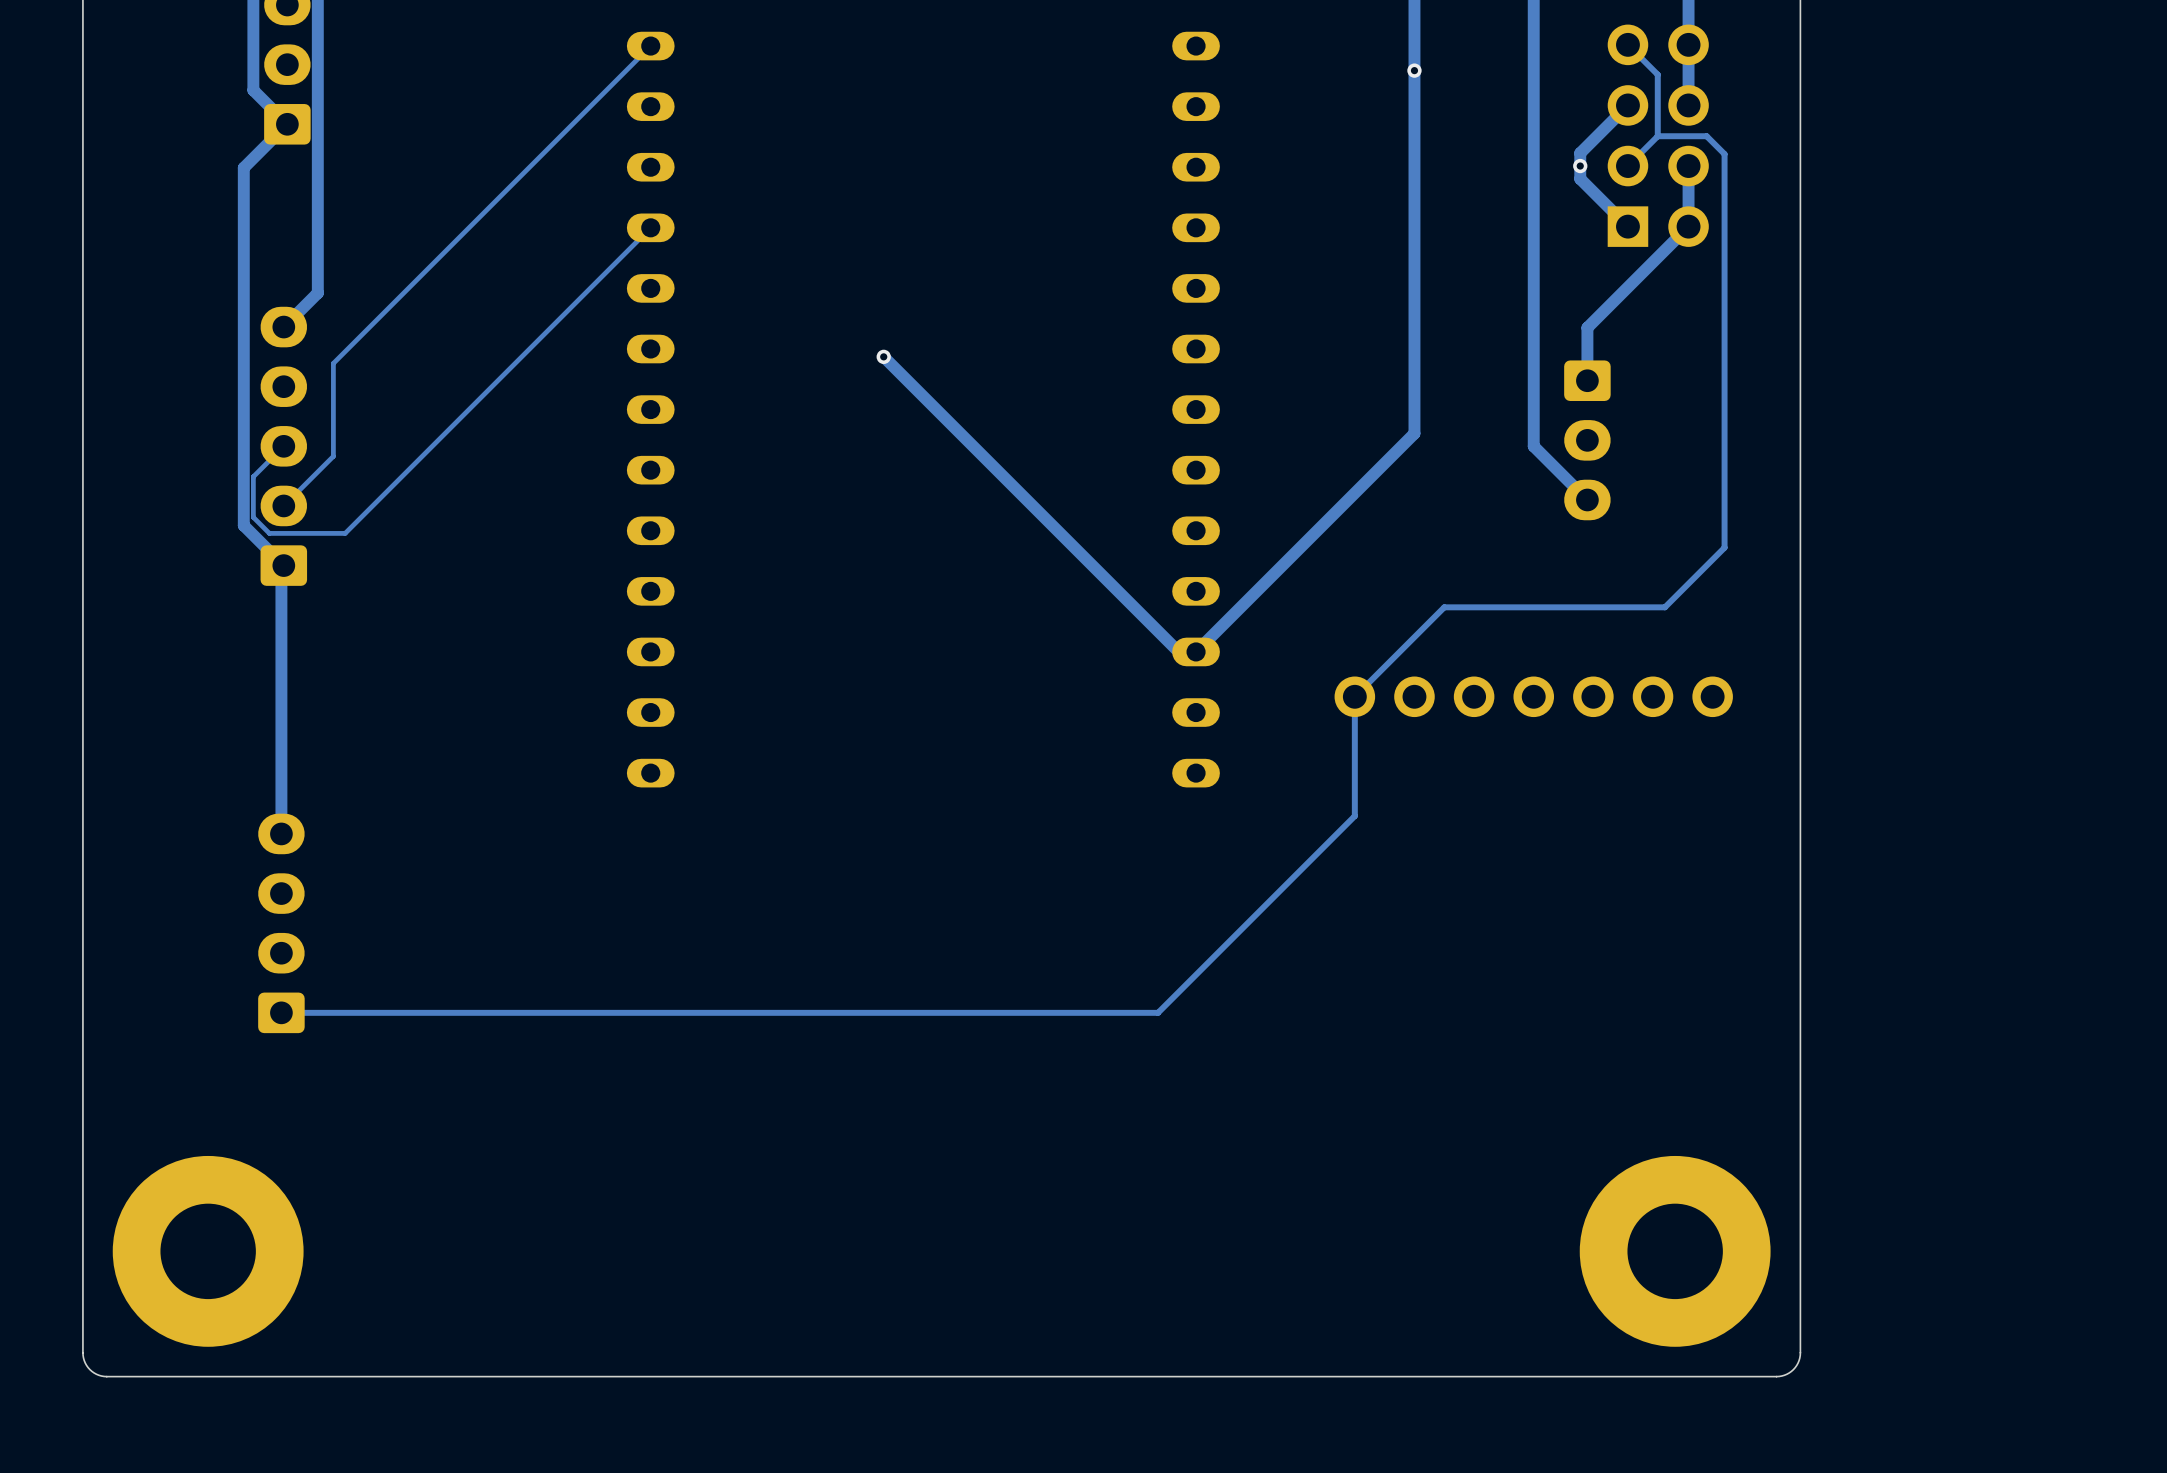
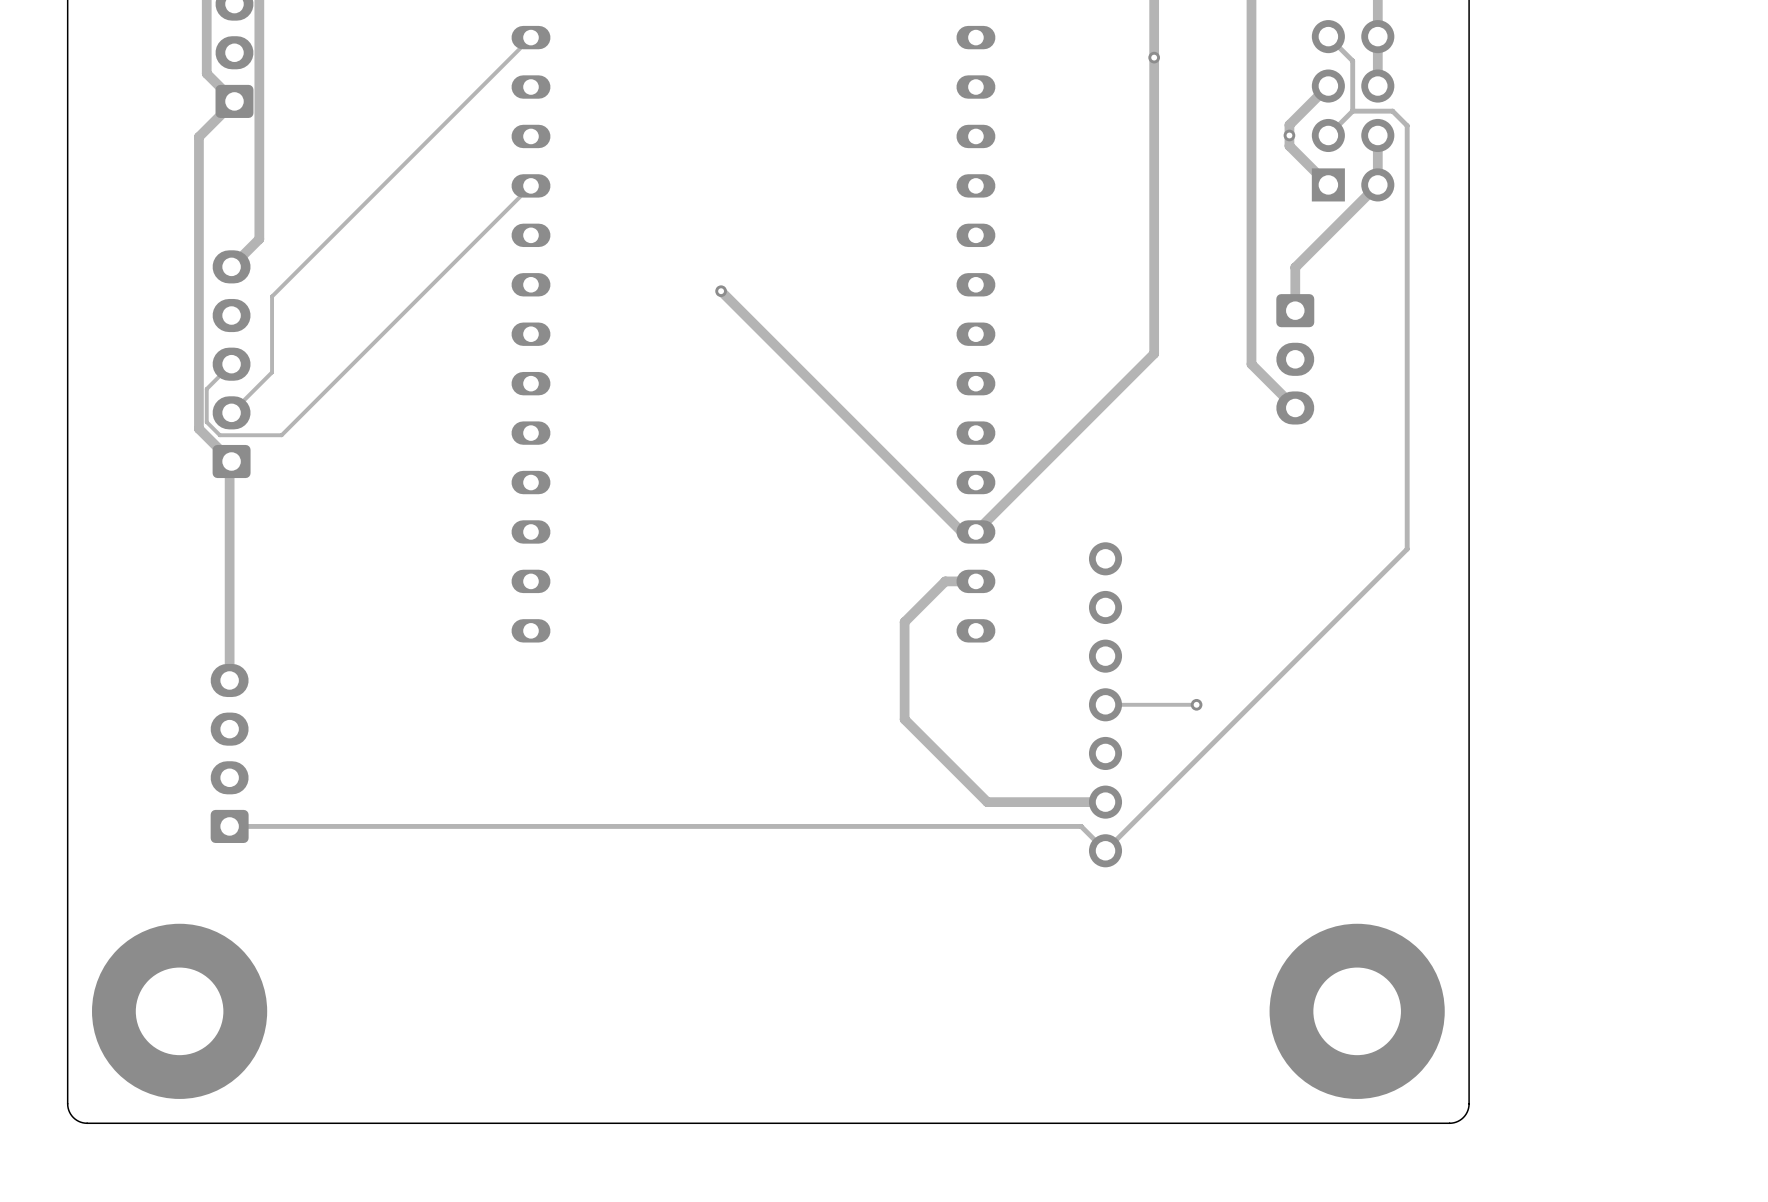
track: (1724, 547) (1664, 607) (1444, 607) (1354, 696) (1354, 816) (1158, 1012) -> (1407, 446) (1407, 549) (1105, 850) (1081, 826) (944, 826)
part rotation: 0° (1533, 696) -> 90° clockwise (1105, 704)
part position: (1533, 696) -> (1105, 704)
track: none -> (975, 581) (945, 581) (904, 622) (904, 719) (987, 802) (1105, 802)
track: none -> (1196, 704) (1105, 704)
via: none -> (1196, 704)
part footprint: [112, 1155, 304, 1347] -> [92, 923, 268, 1099]
part footprint: [1579, 1155, 1771, 1347] -> [1269, 923, 1445, 1099]

